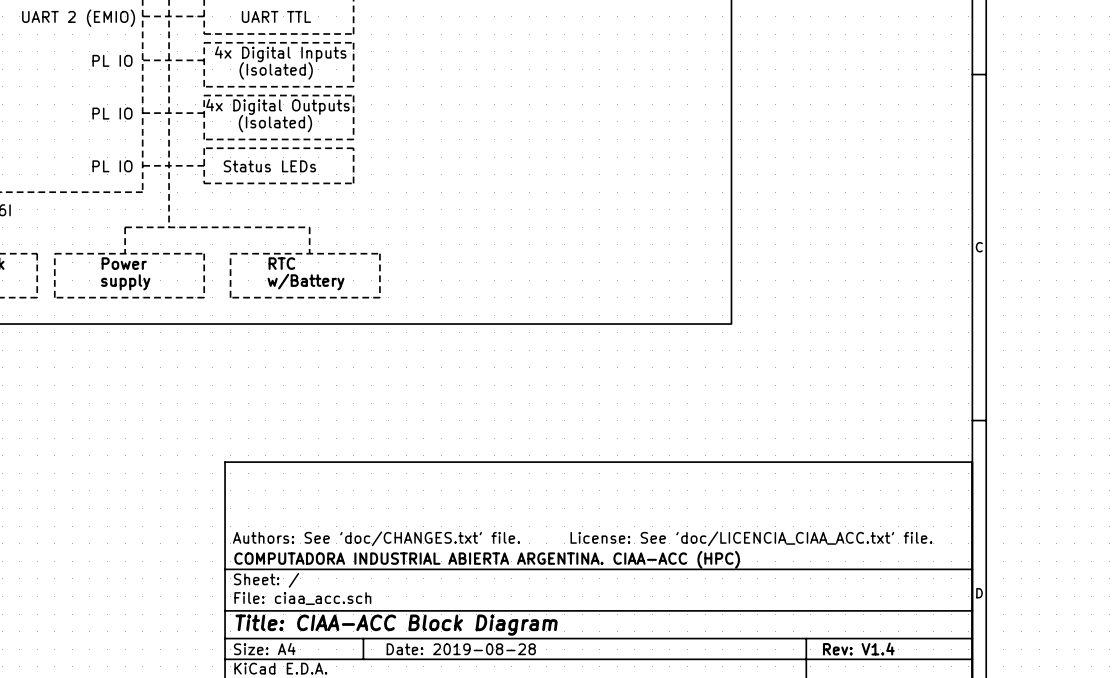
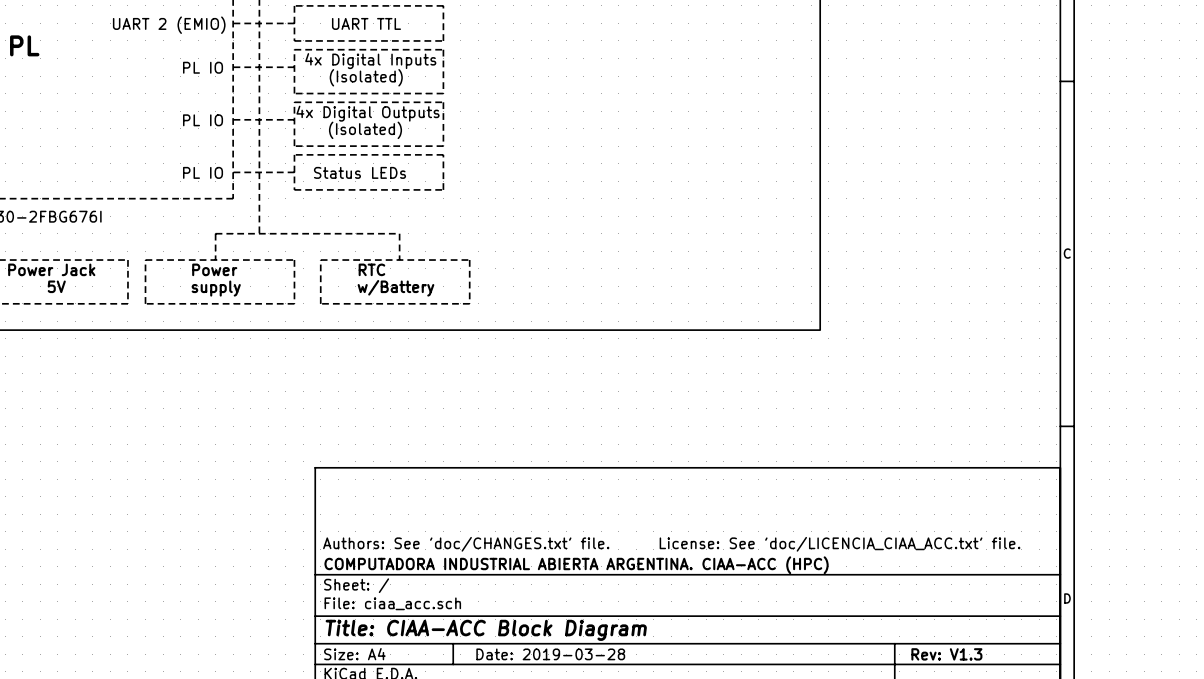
title block: Date: 2019-08-28 (461, 649) -> Date: 2019-03-28 (550, 654)
title block: Rev: V1.4 (858, 649) -> Rev: V1.3 (946, 654)

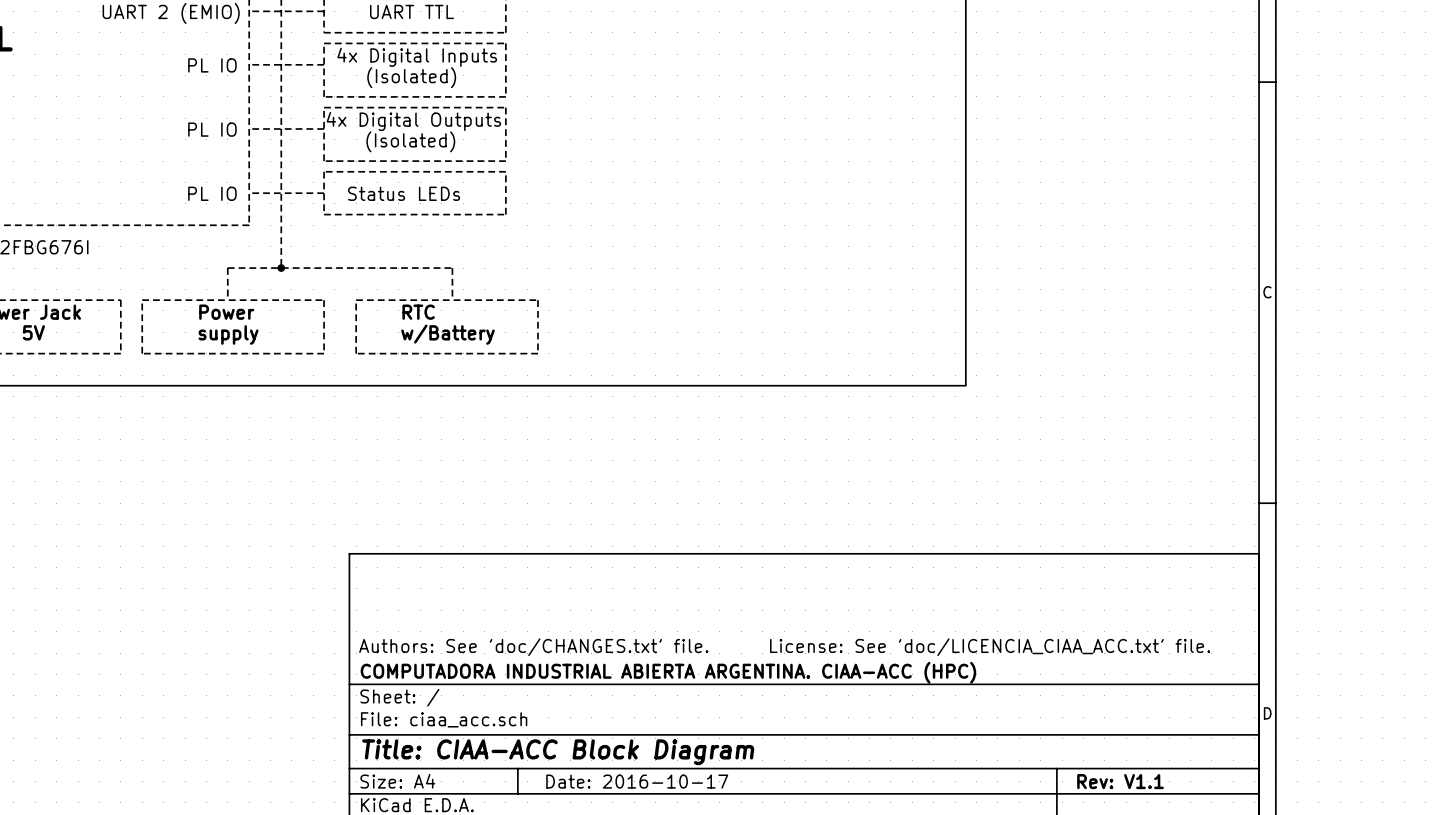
junction: none -> (281, 268)
title block: Date: 2019-03-28 (550, 654) -> Date: 2016-10-17 (637, 781)
title block: Rev: V1.3 (946, 654) -> Rev: V1.1 (1120, 781)

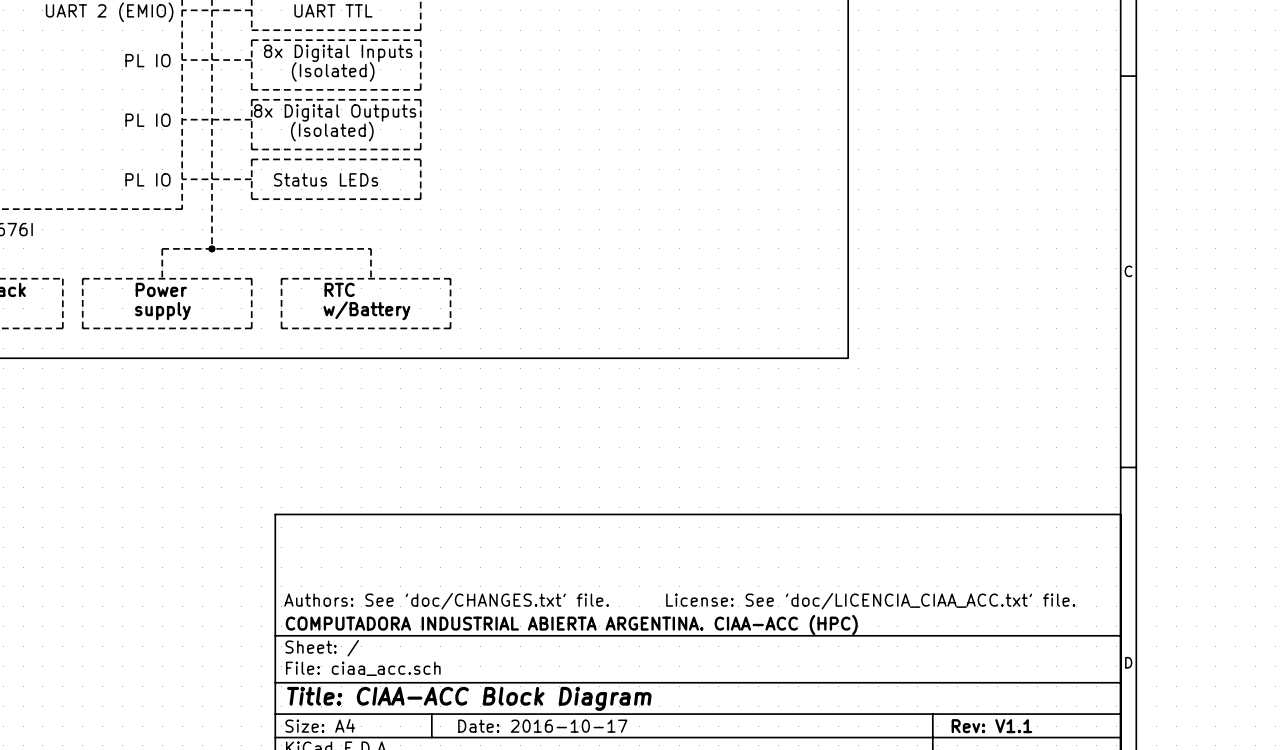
text: 4x Digital Inputs (417, 57) -> 8x Digital Inputs (338, 53)
text: 4x Digital Outputs (413, 121) -> 8x Digital Outputs (335, 112)

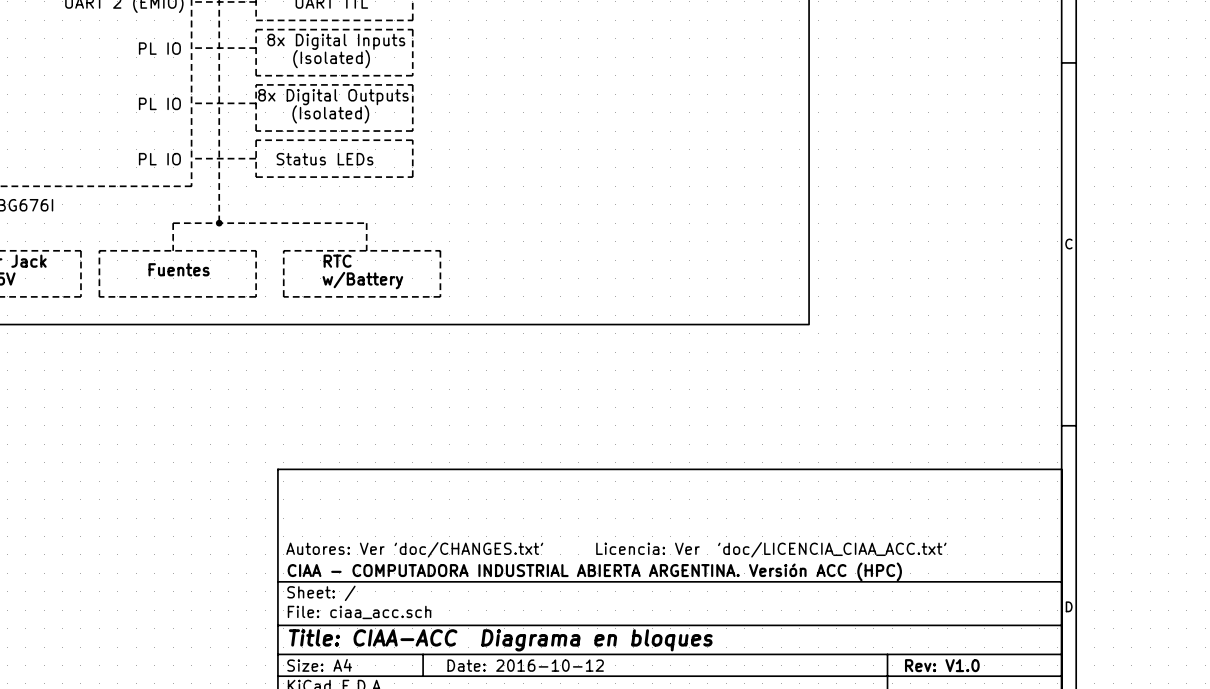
text: Power (161, 289) -> none
text: none -> Fuentes (179, 269)
text: supply (162, 311) -> none
title block: Authors: See 'doc/CHANGES.txt' file. License: See 'doc/LICENCIA_CIAA_ACC.txt' file. (679, 601) -> Autores: Ver 'doc/CHANGES.txt' Licencia: Ver 'doc/LICENCIA_CIAA_ACC.txt' (616, 549)
title block: COMPUTADORA INDUSTRIAL ABIERTA ARGENTINA. CIAA-ACC (HPC) (571, 625) -> CIAA - COMPUTADORA INDUSTRIAL ABIERTA ARGENTINA. Versión ACC (HPC) (594, 571)
title block: Title: CIAA-ACC Block Diagram (469, 698) -> Title: CIAA-ACC Diagrama en bloques (500, 640)
title block: Date: 2016-10-17 (542, 726) -> Date: 2016-10-12 (525, 665)
title block: Rev: V1.1 (991, 726) -> Rev: V1.0 (942, 665)

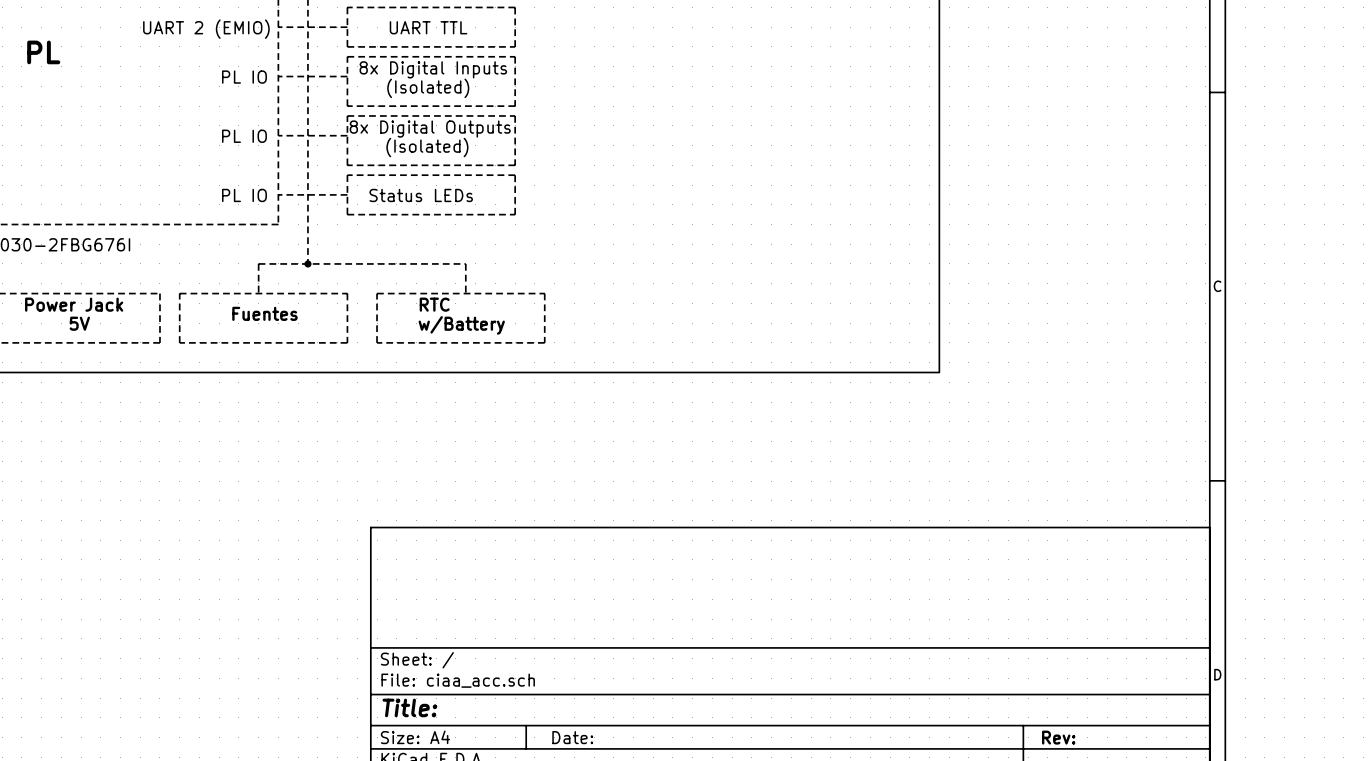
title block: Autores: Ver 'doc/CHANGES.txt' Licencia: Ver 'doc/LICENCIA_CIAA_ACC.txt' (616, 549) -> none
title block: CIAA - COMPUTADORA INDUSTRIAL ABIERTA ARGENTINA. Versión ACC (HPC) (594, 571) -> none
title block: Title: CIAA-ACC Diagrama en bloques (500, 640) -> Title: (409, 707)
title block: Date: 2016-10-12 (525, 665) -> Date: (572, 737)
title block: Rev: V1.0 (942, 665) -> Rev: (1058, 737)

